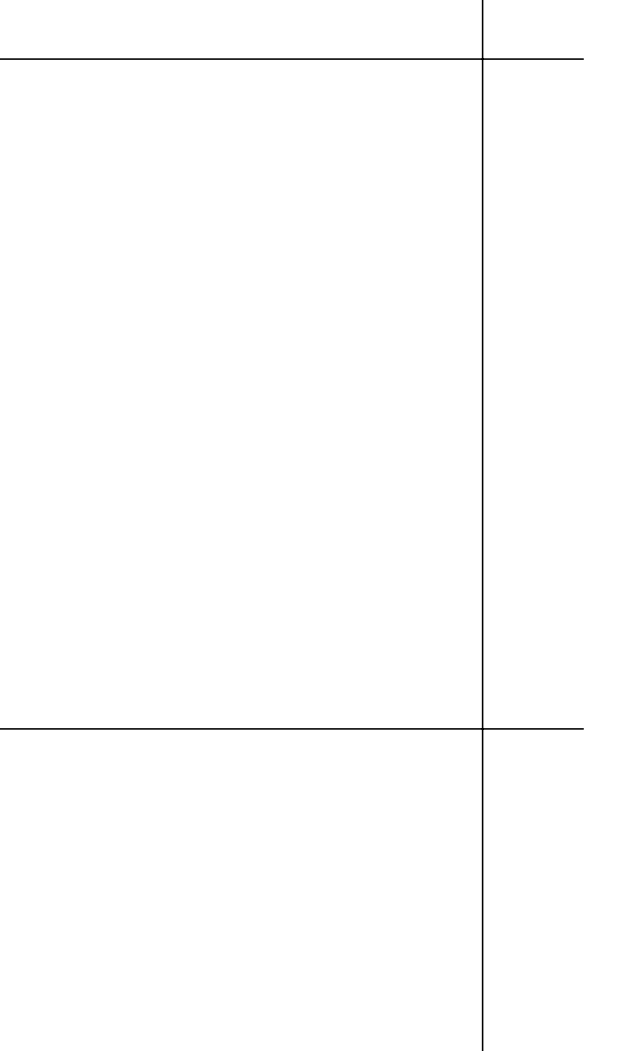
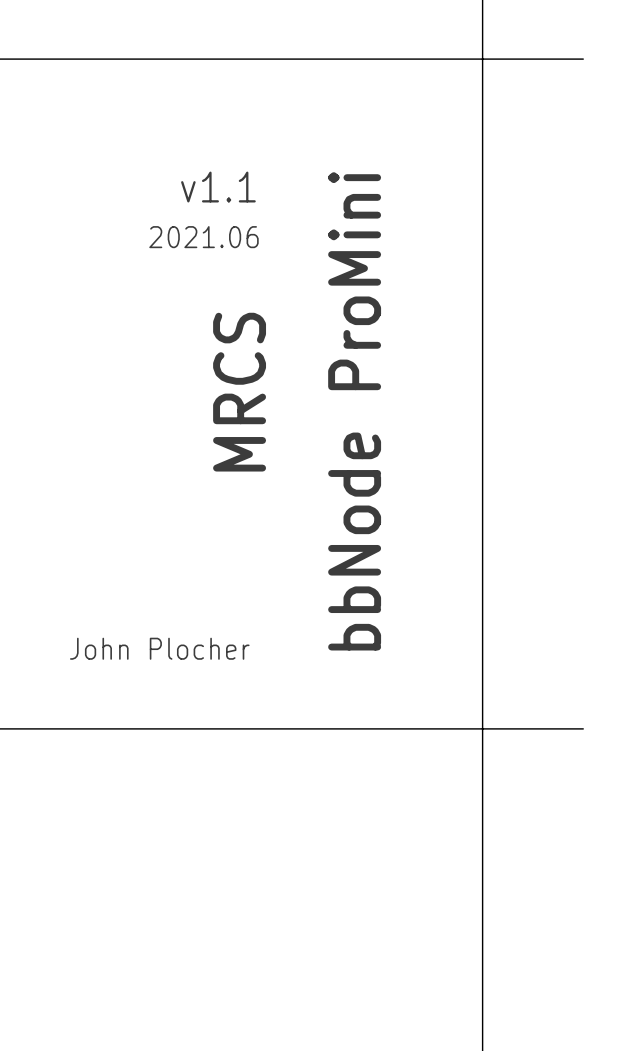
text: none -> v1.1 (218, 187)
text: none -> 2021.06 (203, 237)
text: none -> MRCS (239, 392)
text: none -> bbNode ProMini (354, 411)
text: none -> John Plocher (159, 648)

